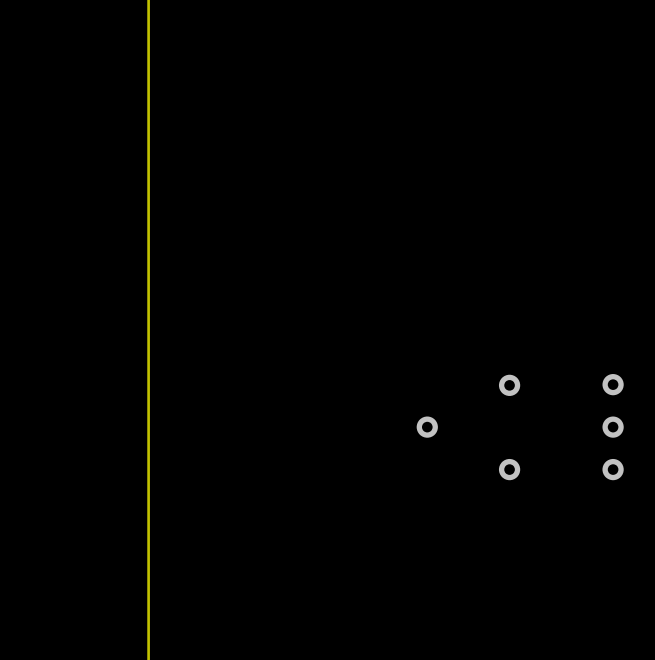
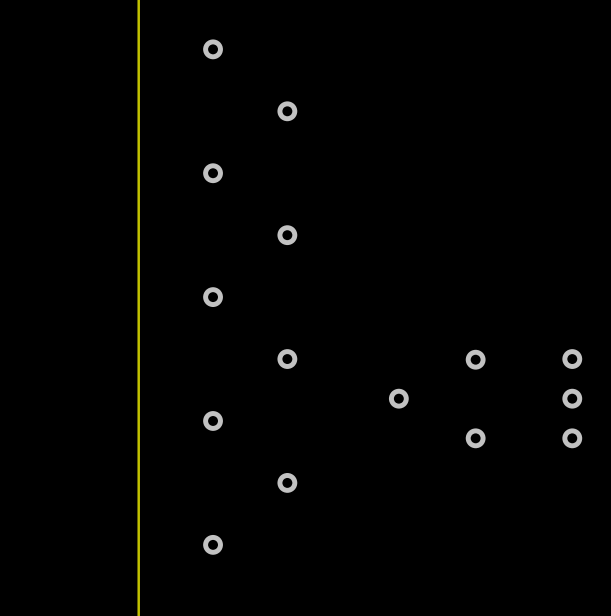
via: none -> (213, 49)
via: none -> (287, 111)
via: none -> (213, 173)
via: none -> (287, 235)
via: none -> (213, 297)
via: none -> (287, 359)
via: none -> (213, 420)
via: none -> (287, 482)
via: none -> (213, 544)

